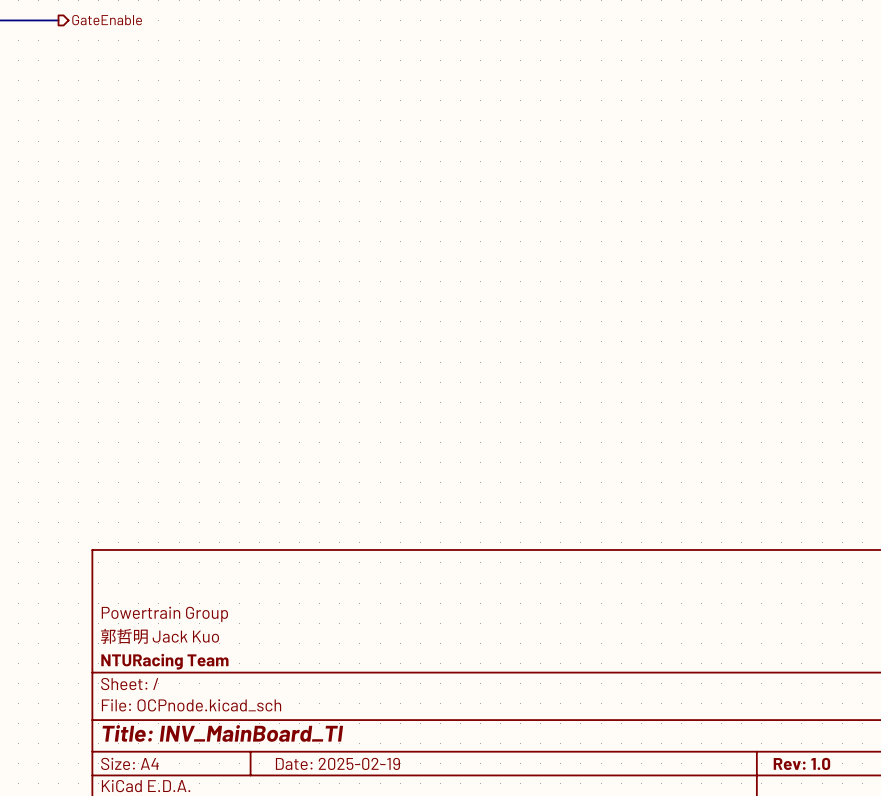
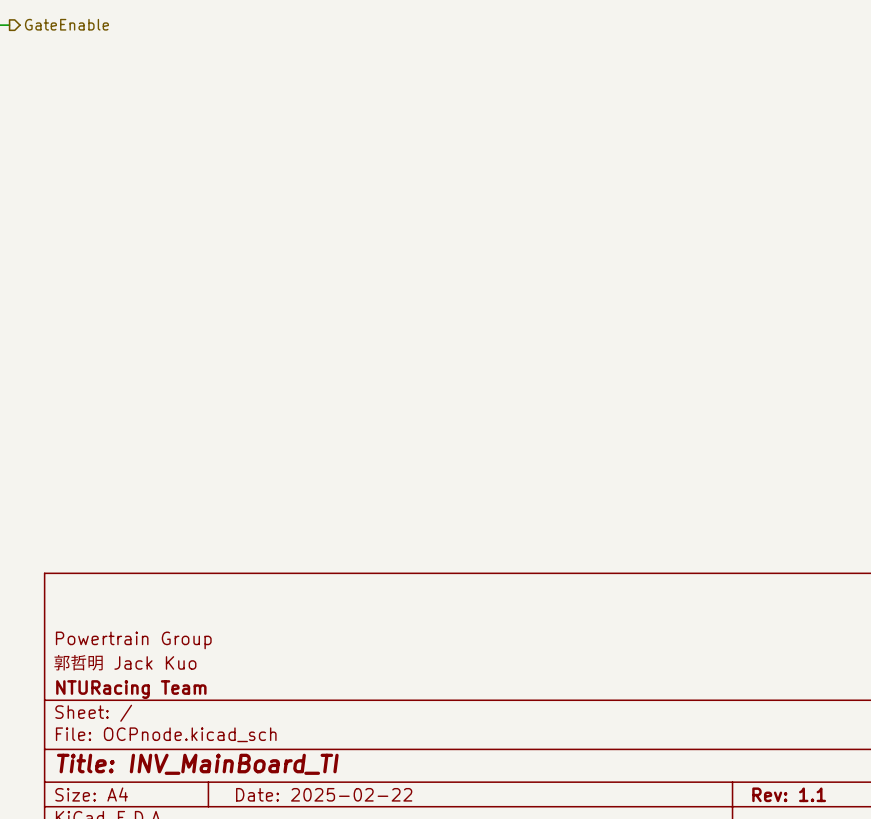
title block: Date: 2025-02-19 (337, 763) -> Date: 2025-02-22 (324, 794)
title block: Rev: 1.0 (801, 763) -> Rev: 1.1 (789, 794)

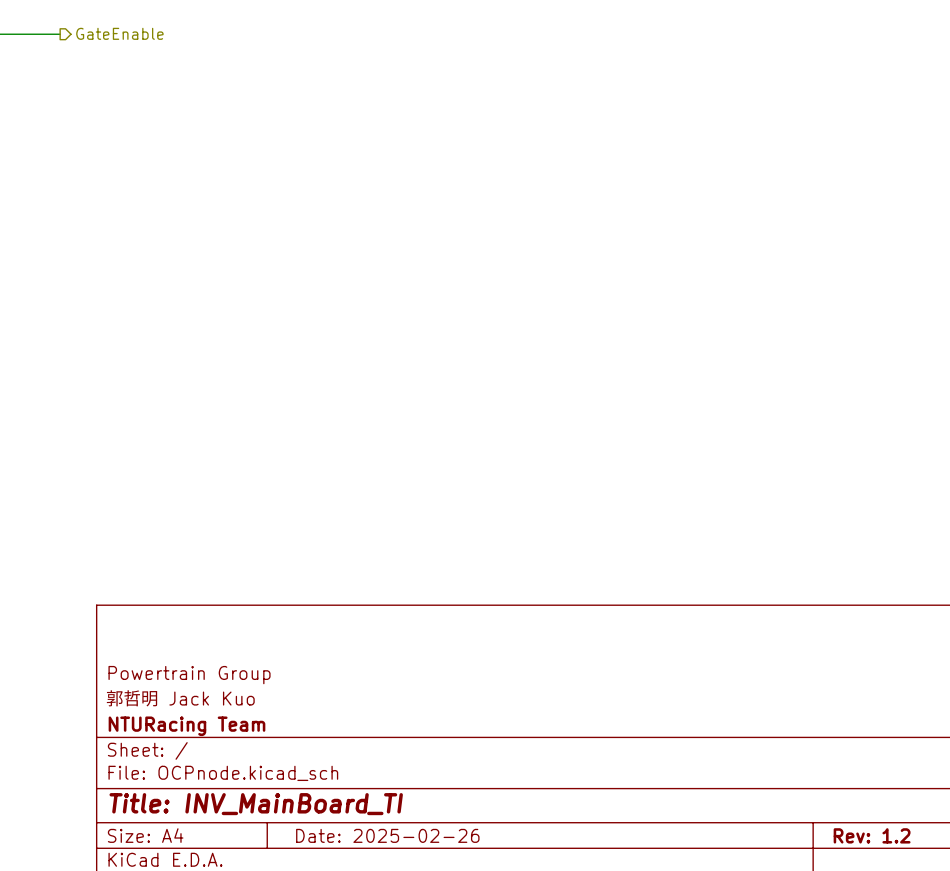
title block: Date: 2025-02-22 (324, 794) -> Date: 2025-02-26 (387, 835)
title block: Rev: 1.1 (789, 794) -> Rev: 1.2 (872, 835)

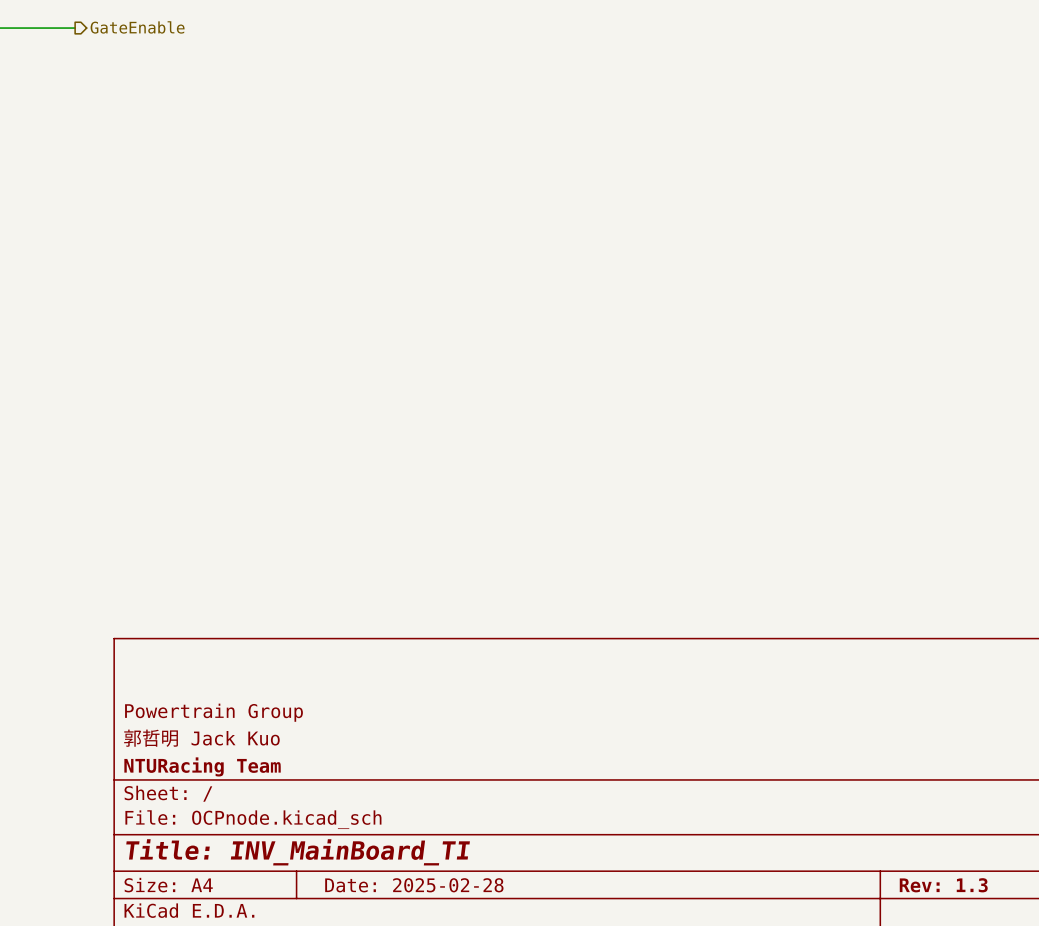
title block: Date: 2025-02-26 (387, 835) -> Date: 2025-02-28 (414, 885)
title block: Rev: 1.2 (872, 835) -> Rev: 1.3 (943, 885)

